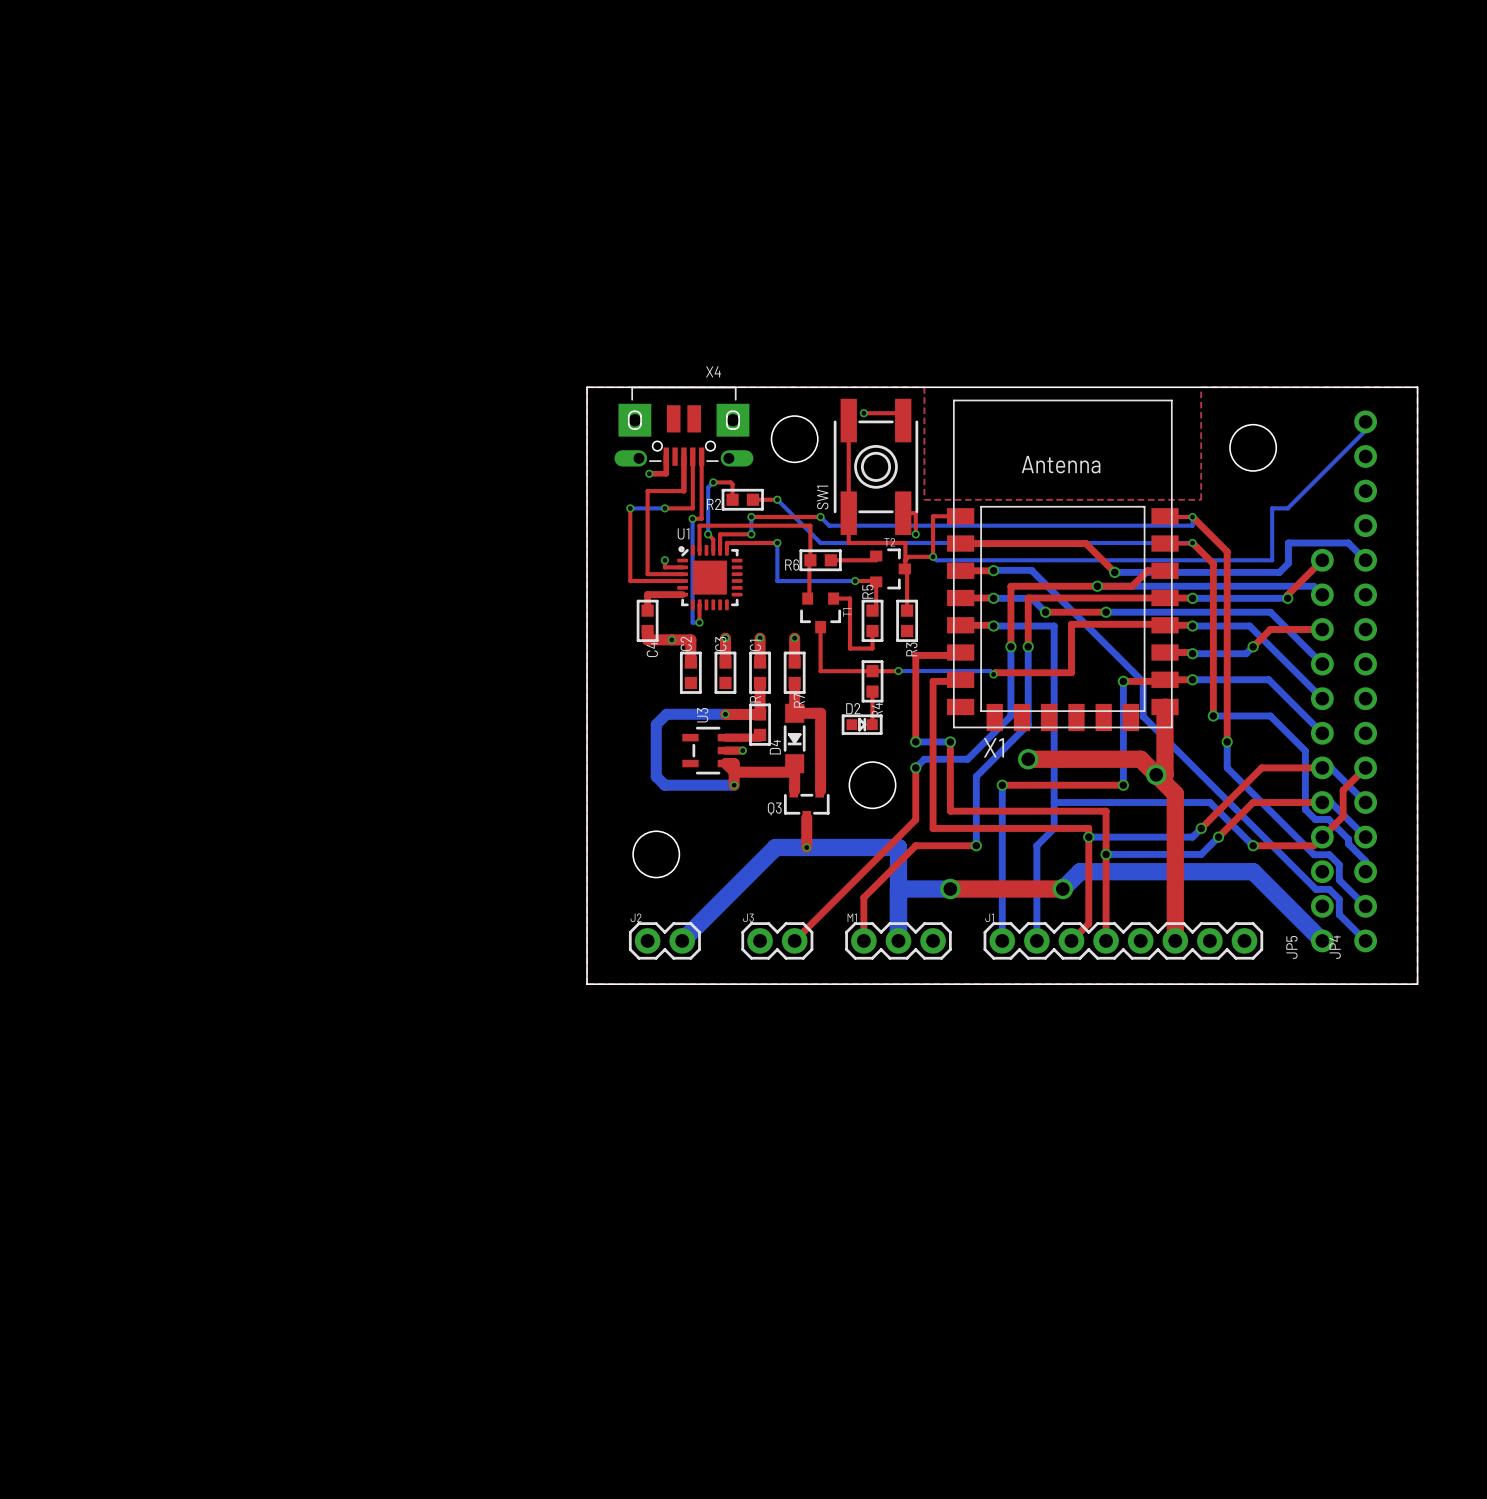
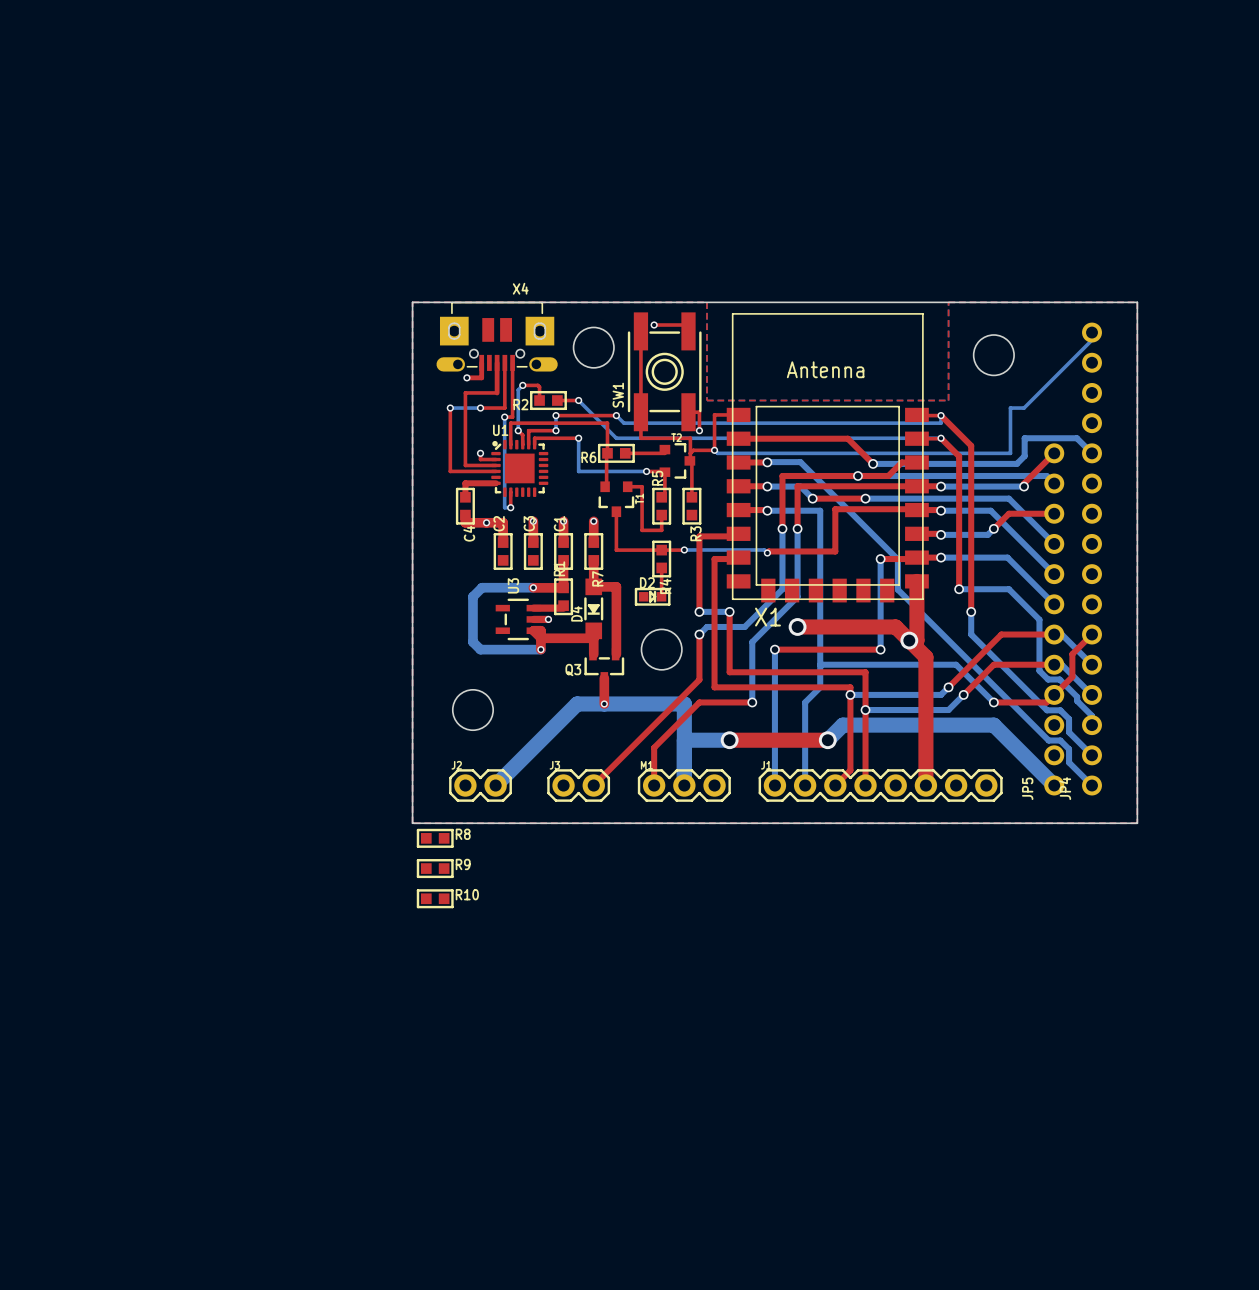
R8: none -> (435, 838)
R9: none -> (435, 868)
R10: none -> (435, 898)

